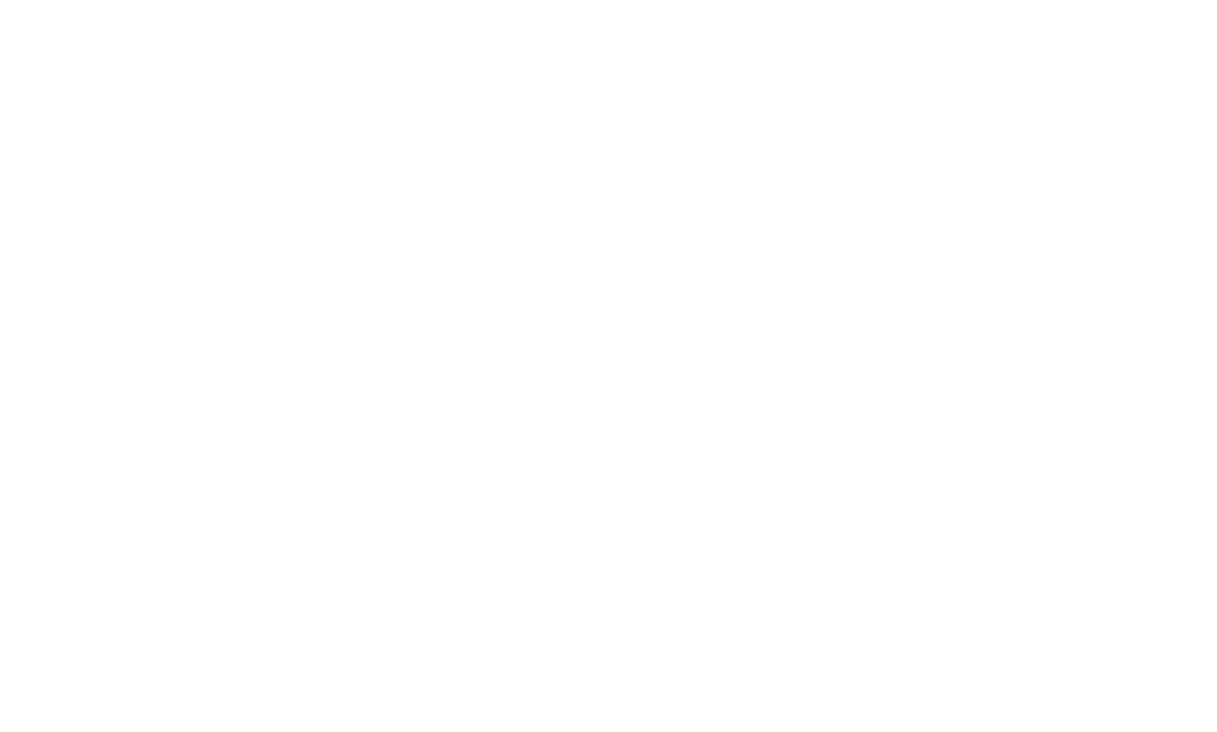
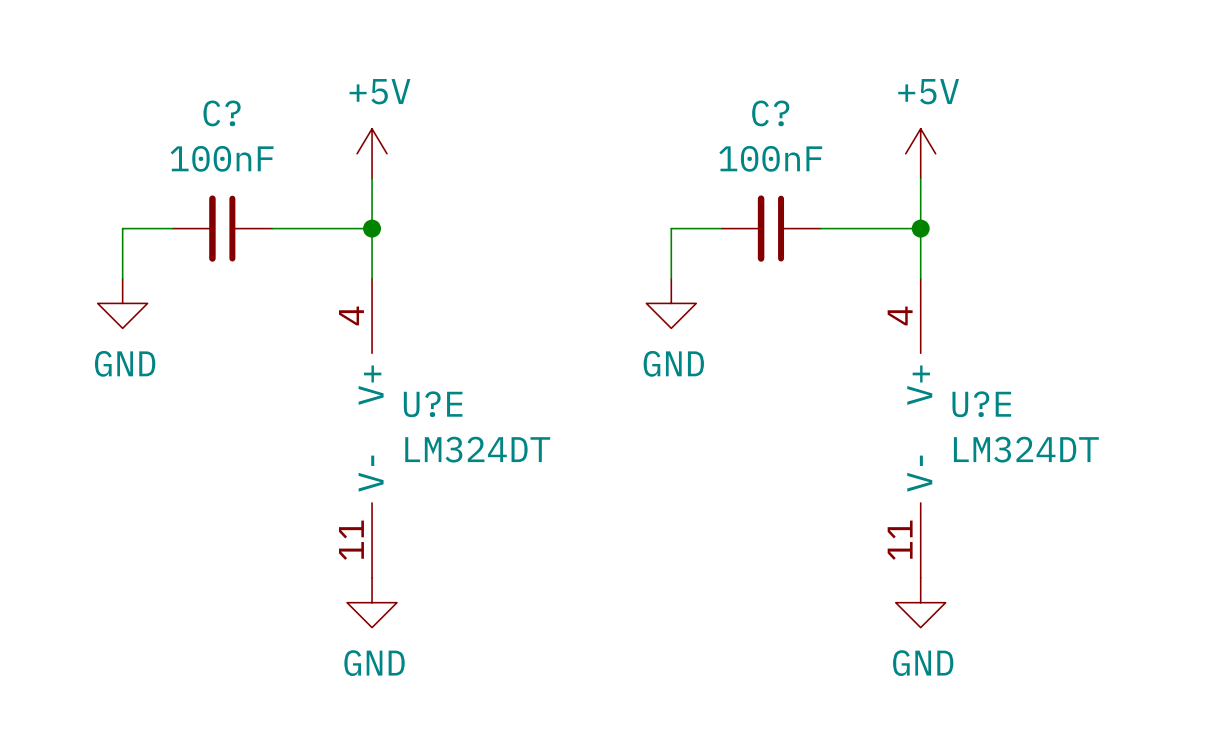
power symbol: none -> +5V (372, 153)
power symbol: none -> +5V (920, 153)
wire: none -> (372, 178) (372, 278)
wire: none -> (920, 178) (920, 278)
wire: none -> (172, 228) (122, 228) (122, 278)
C?: none -> 100nF (222, 228)
wire: none -> (272, 228) (372, 228)
junction: none -> (372, 228)
wire: none -> (721, 228) (671, 228) (671, 278)
C?: none -> 100nF (771, 228)
wire: none -> (820, 228) (920, 228)
junction: none -> (920, 228)
power symbol: none -> GND (122, 303)
power symbol: none -> GND (671, 303)
U?E: none -> LM324DT (372, 428)
U?E: none -> LM324DT (920, 428)
power symbol: none -> GND (372, 602)
power symbol: none -> GND (920, 602)

